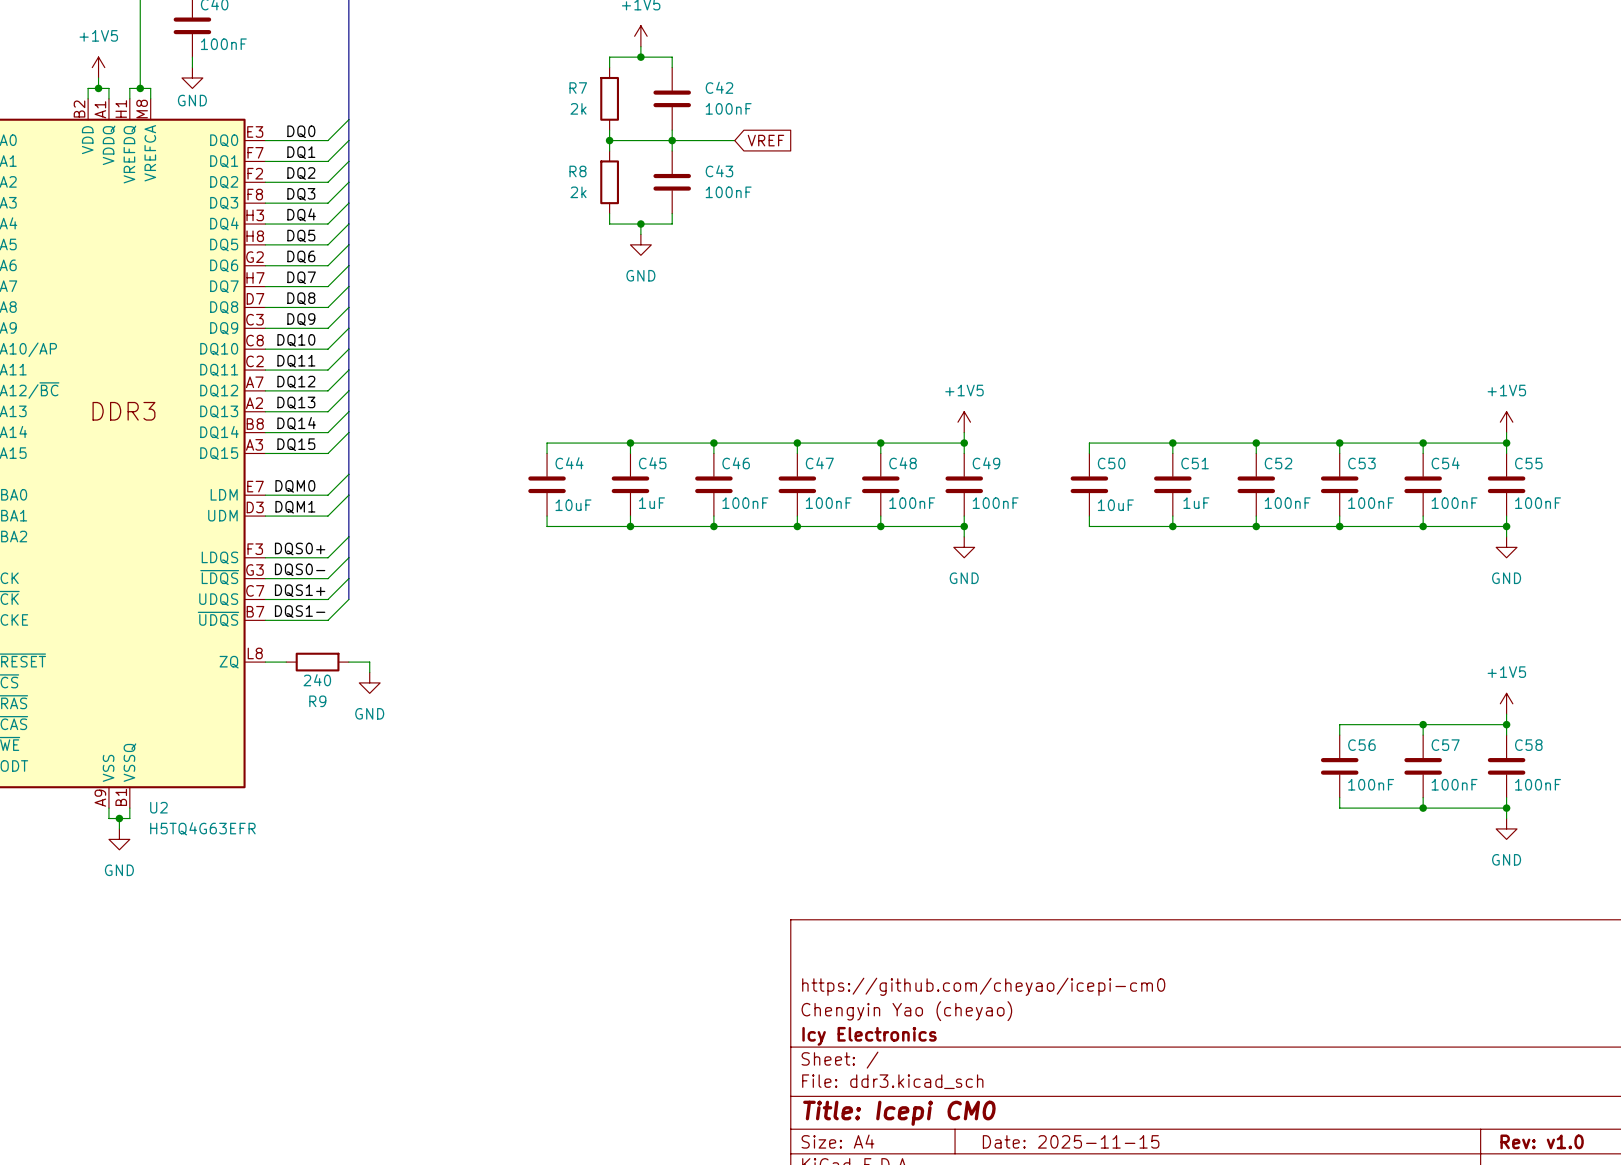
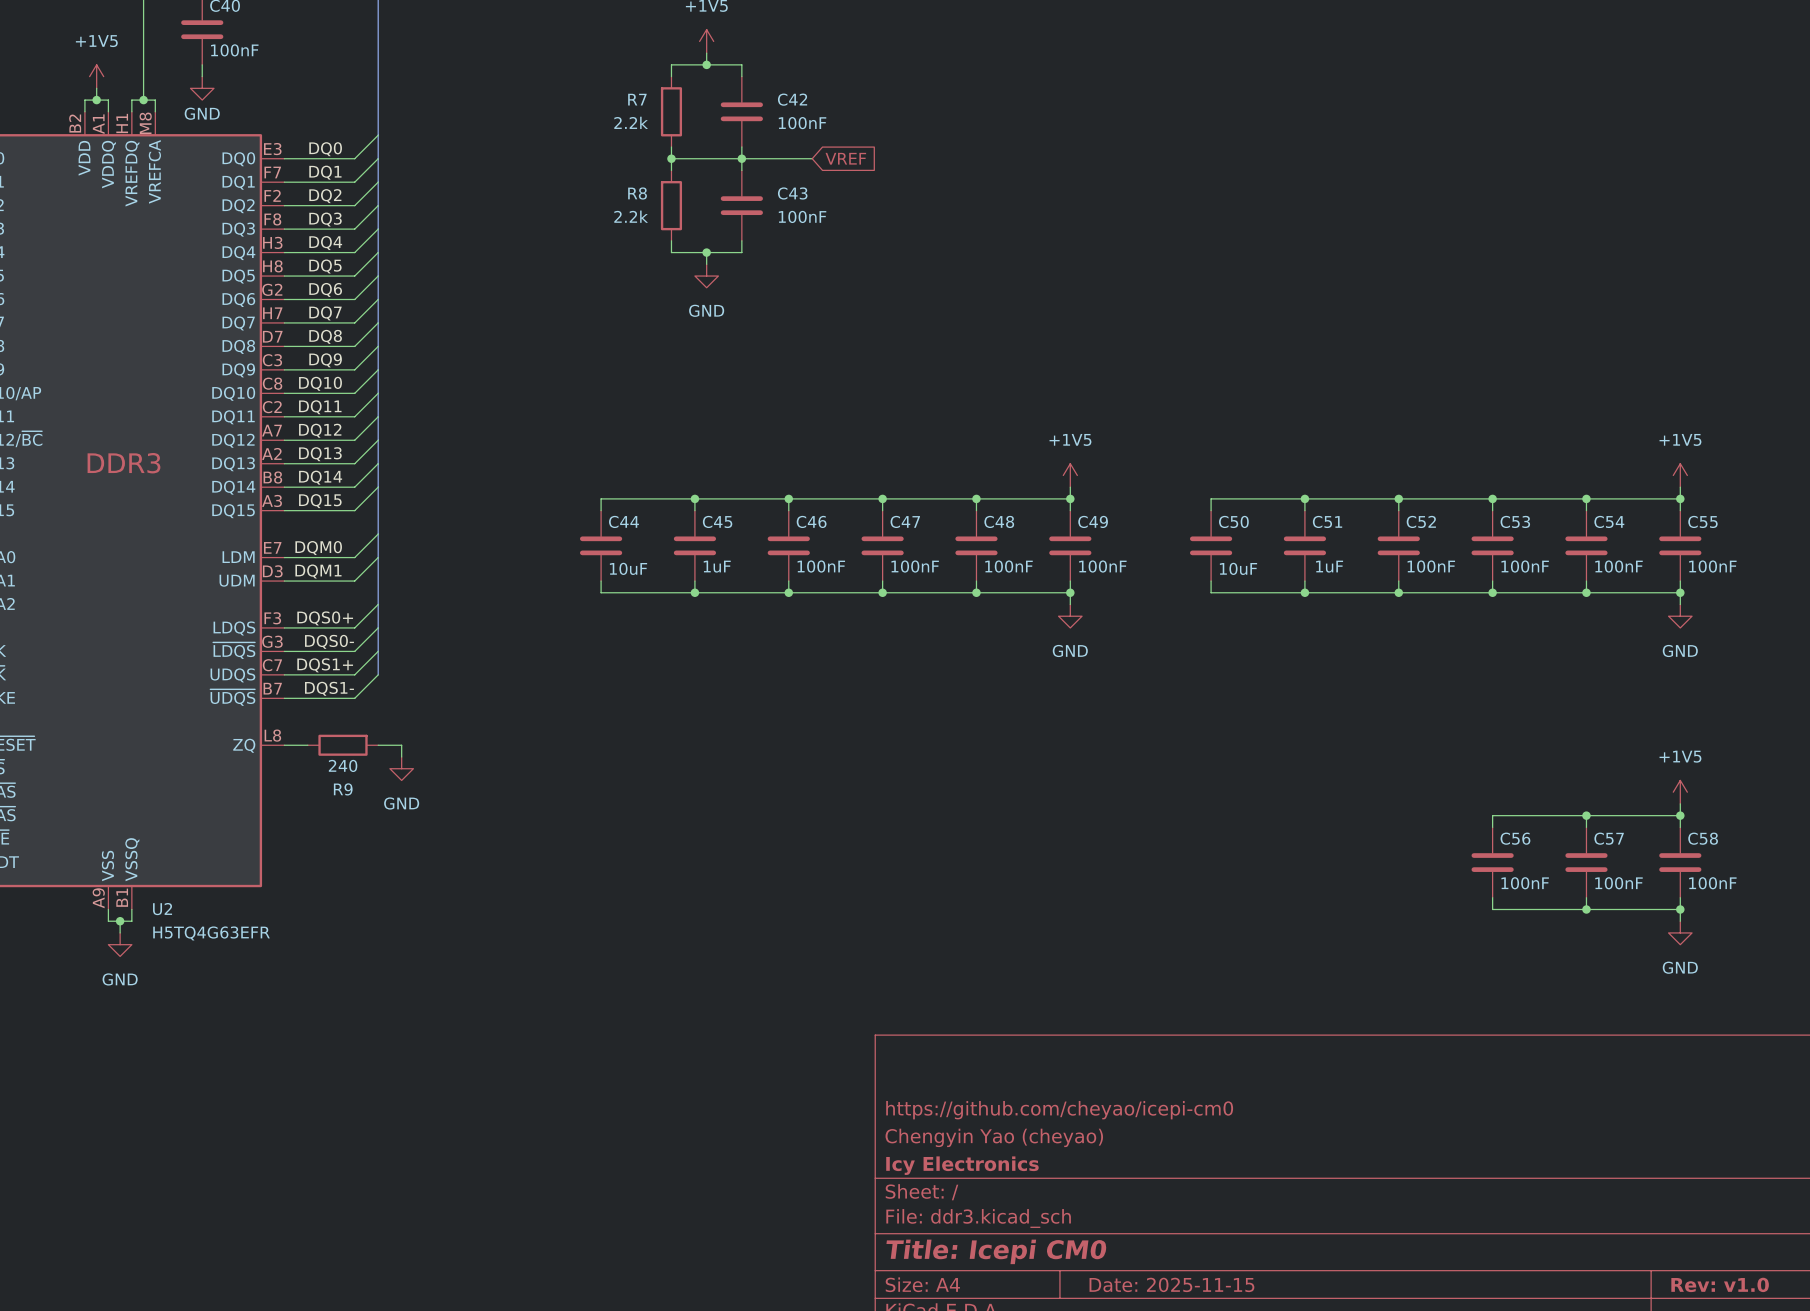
R7 value: 2k (578, 108) -> 2.2k (631, 122)
R8 value: 2k (578, 192) -> 2.2k (631, 216)

